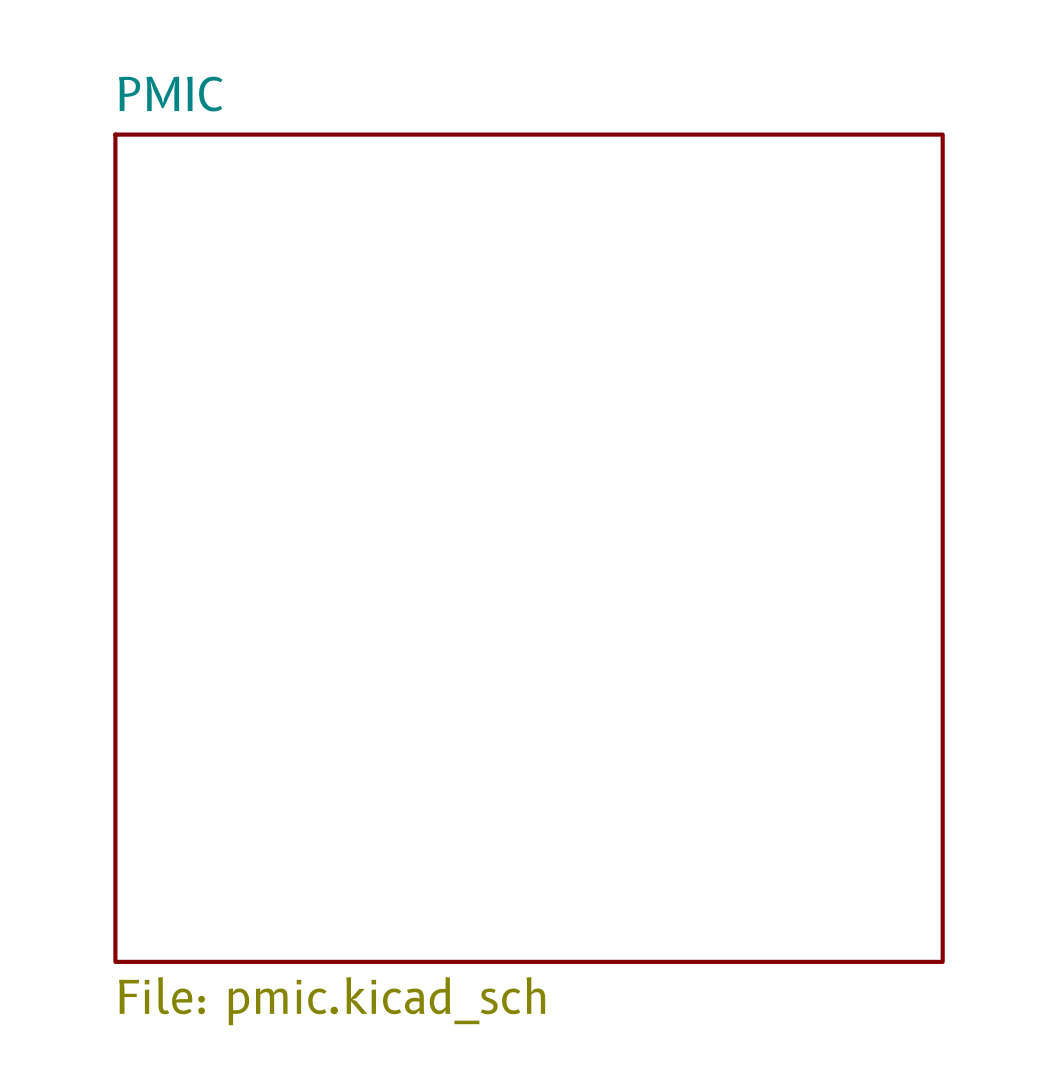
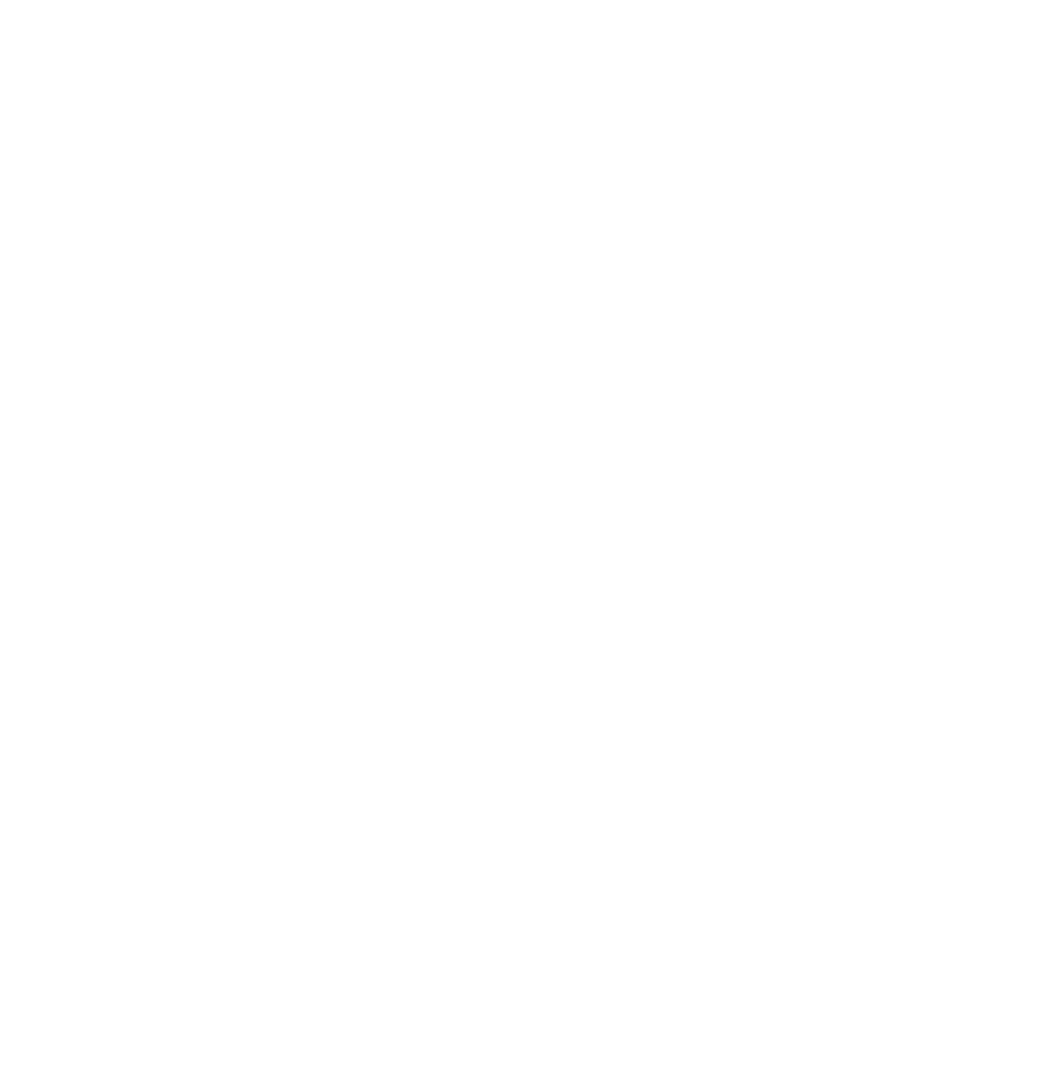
sheet PMIC: File: pmic.kicad_sch (529, 548) -> none

